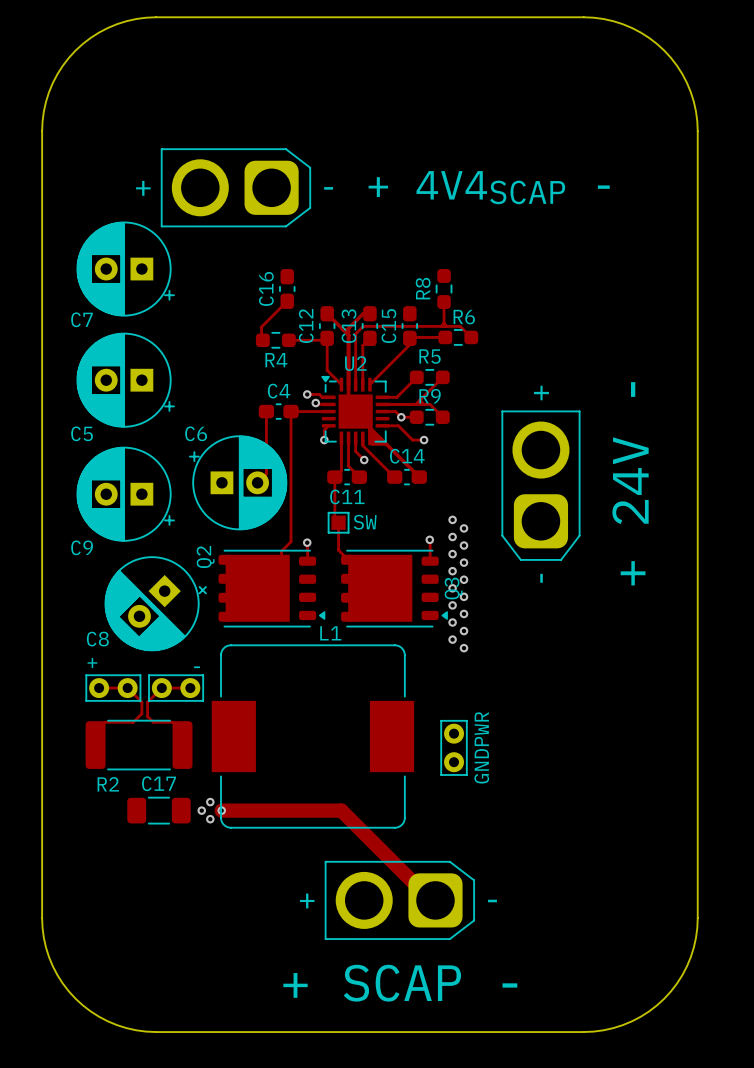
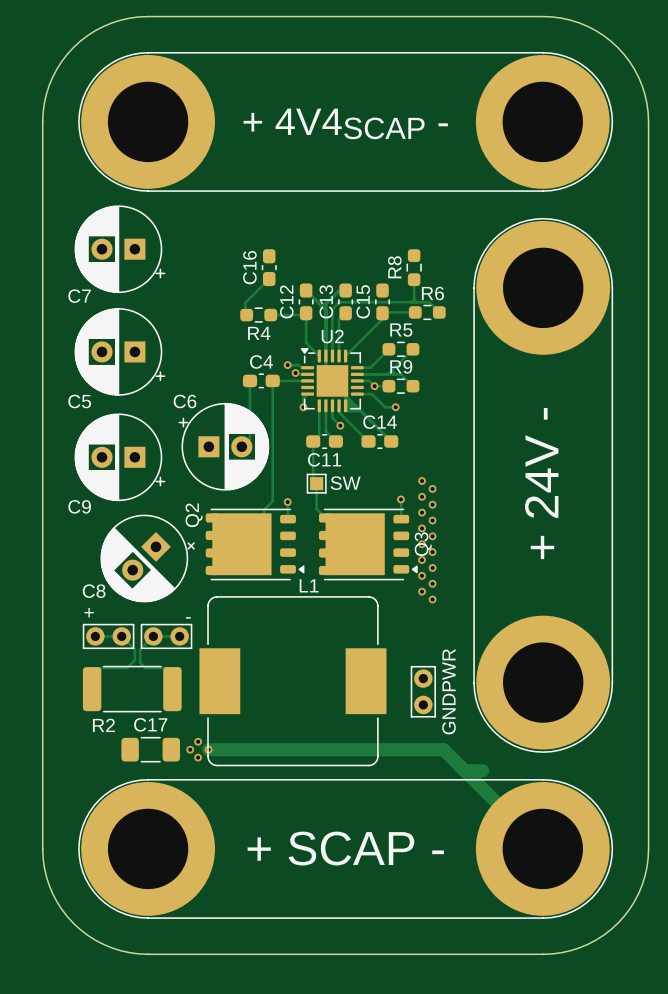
part: none -> (345, 121)
part: (235, 187) -> none
text position: + 4V4SCAP - (489, 187) -> + 4V4SCAP - (345, 123)
text position: + 24V - (630, 483) -> + 24V - (541, 483)
part: (540, 485) -> none
part: none -> (543, 485)
track: (341, 810) (431, 900) (435, 900) -> (319, 749) (443, 749) (542, 848)
track: none -> (464, 770) (482, 770)
part: (399, 900) -> none
part: none -> (345, 848)
text position: + SCAP - (400, 983) -> + SCAP - (345, 848)

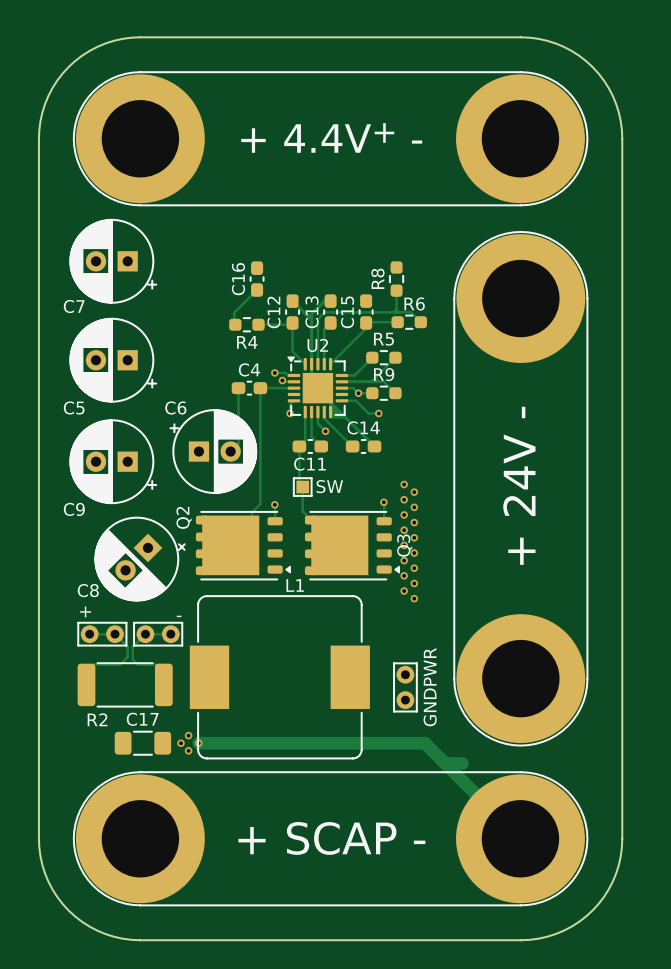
text: + 4V4SCAP - (345, 123) -> + 4.4V+ - (331, 137)

